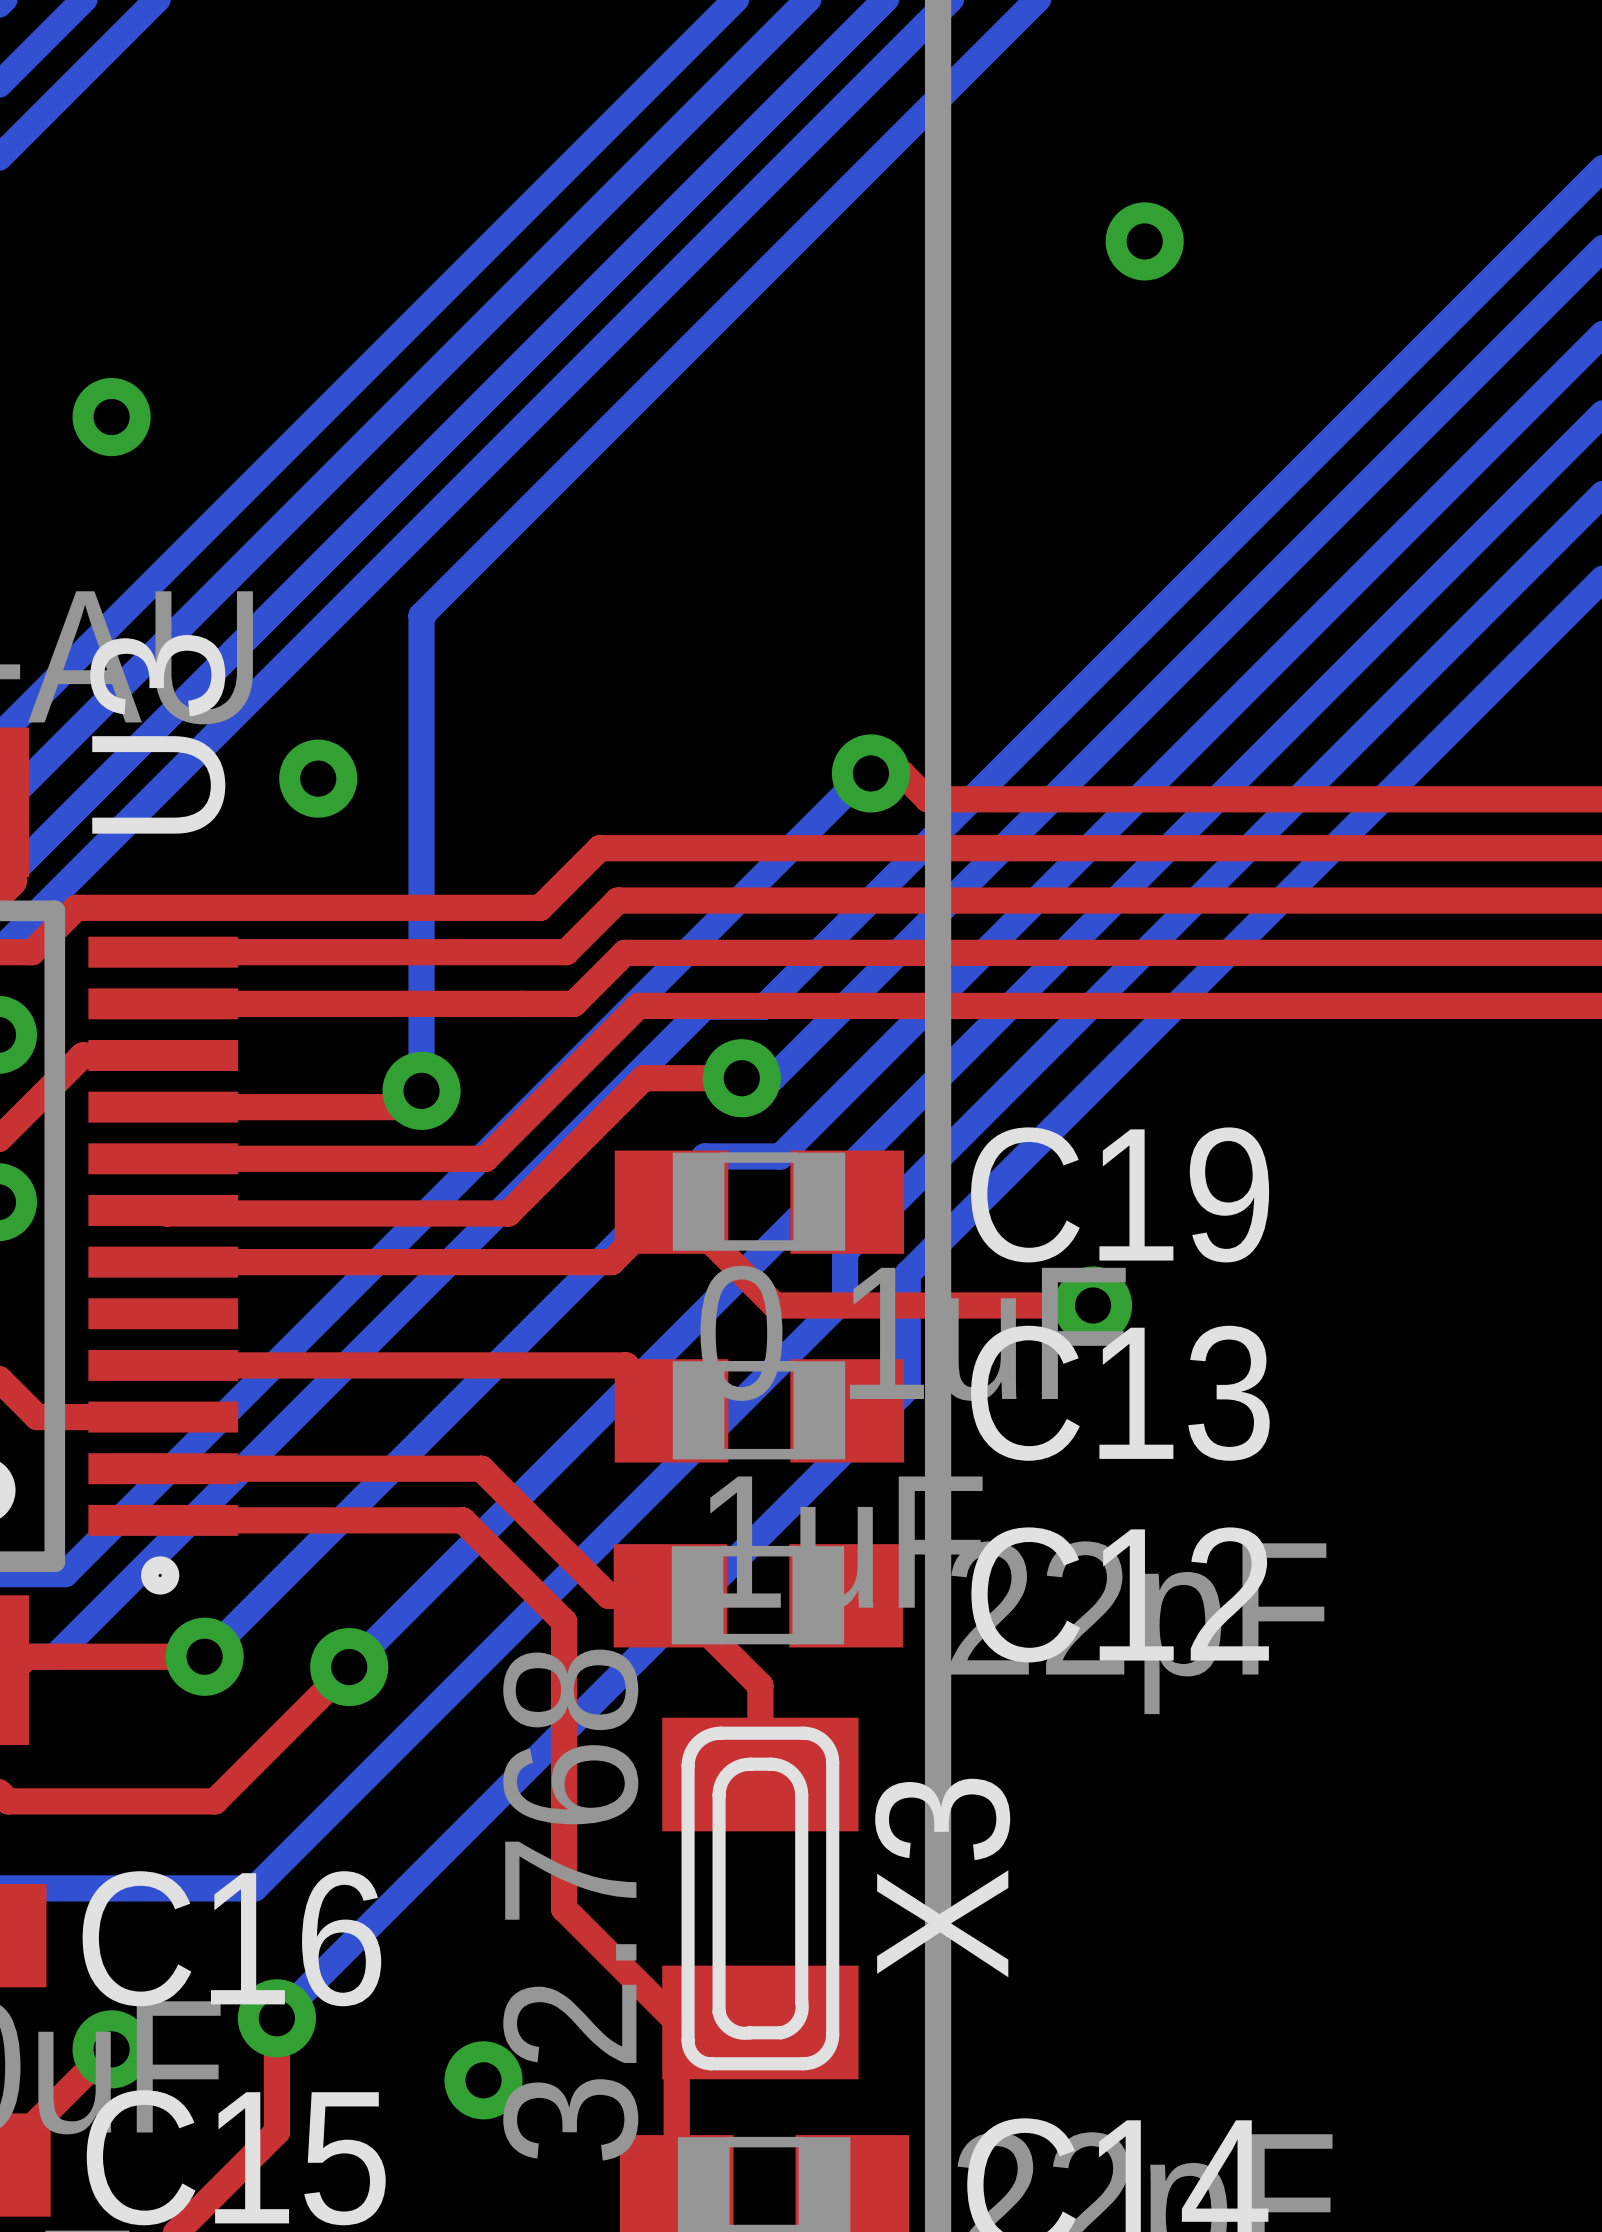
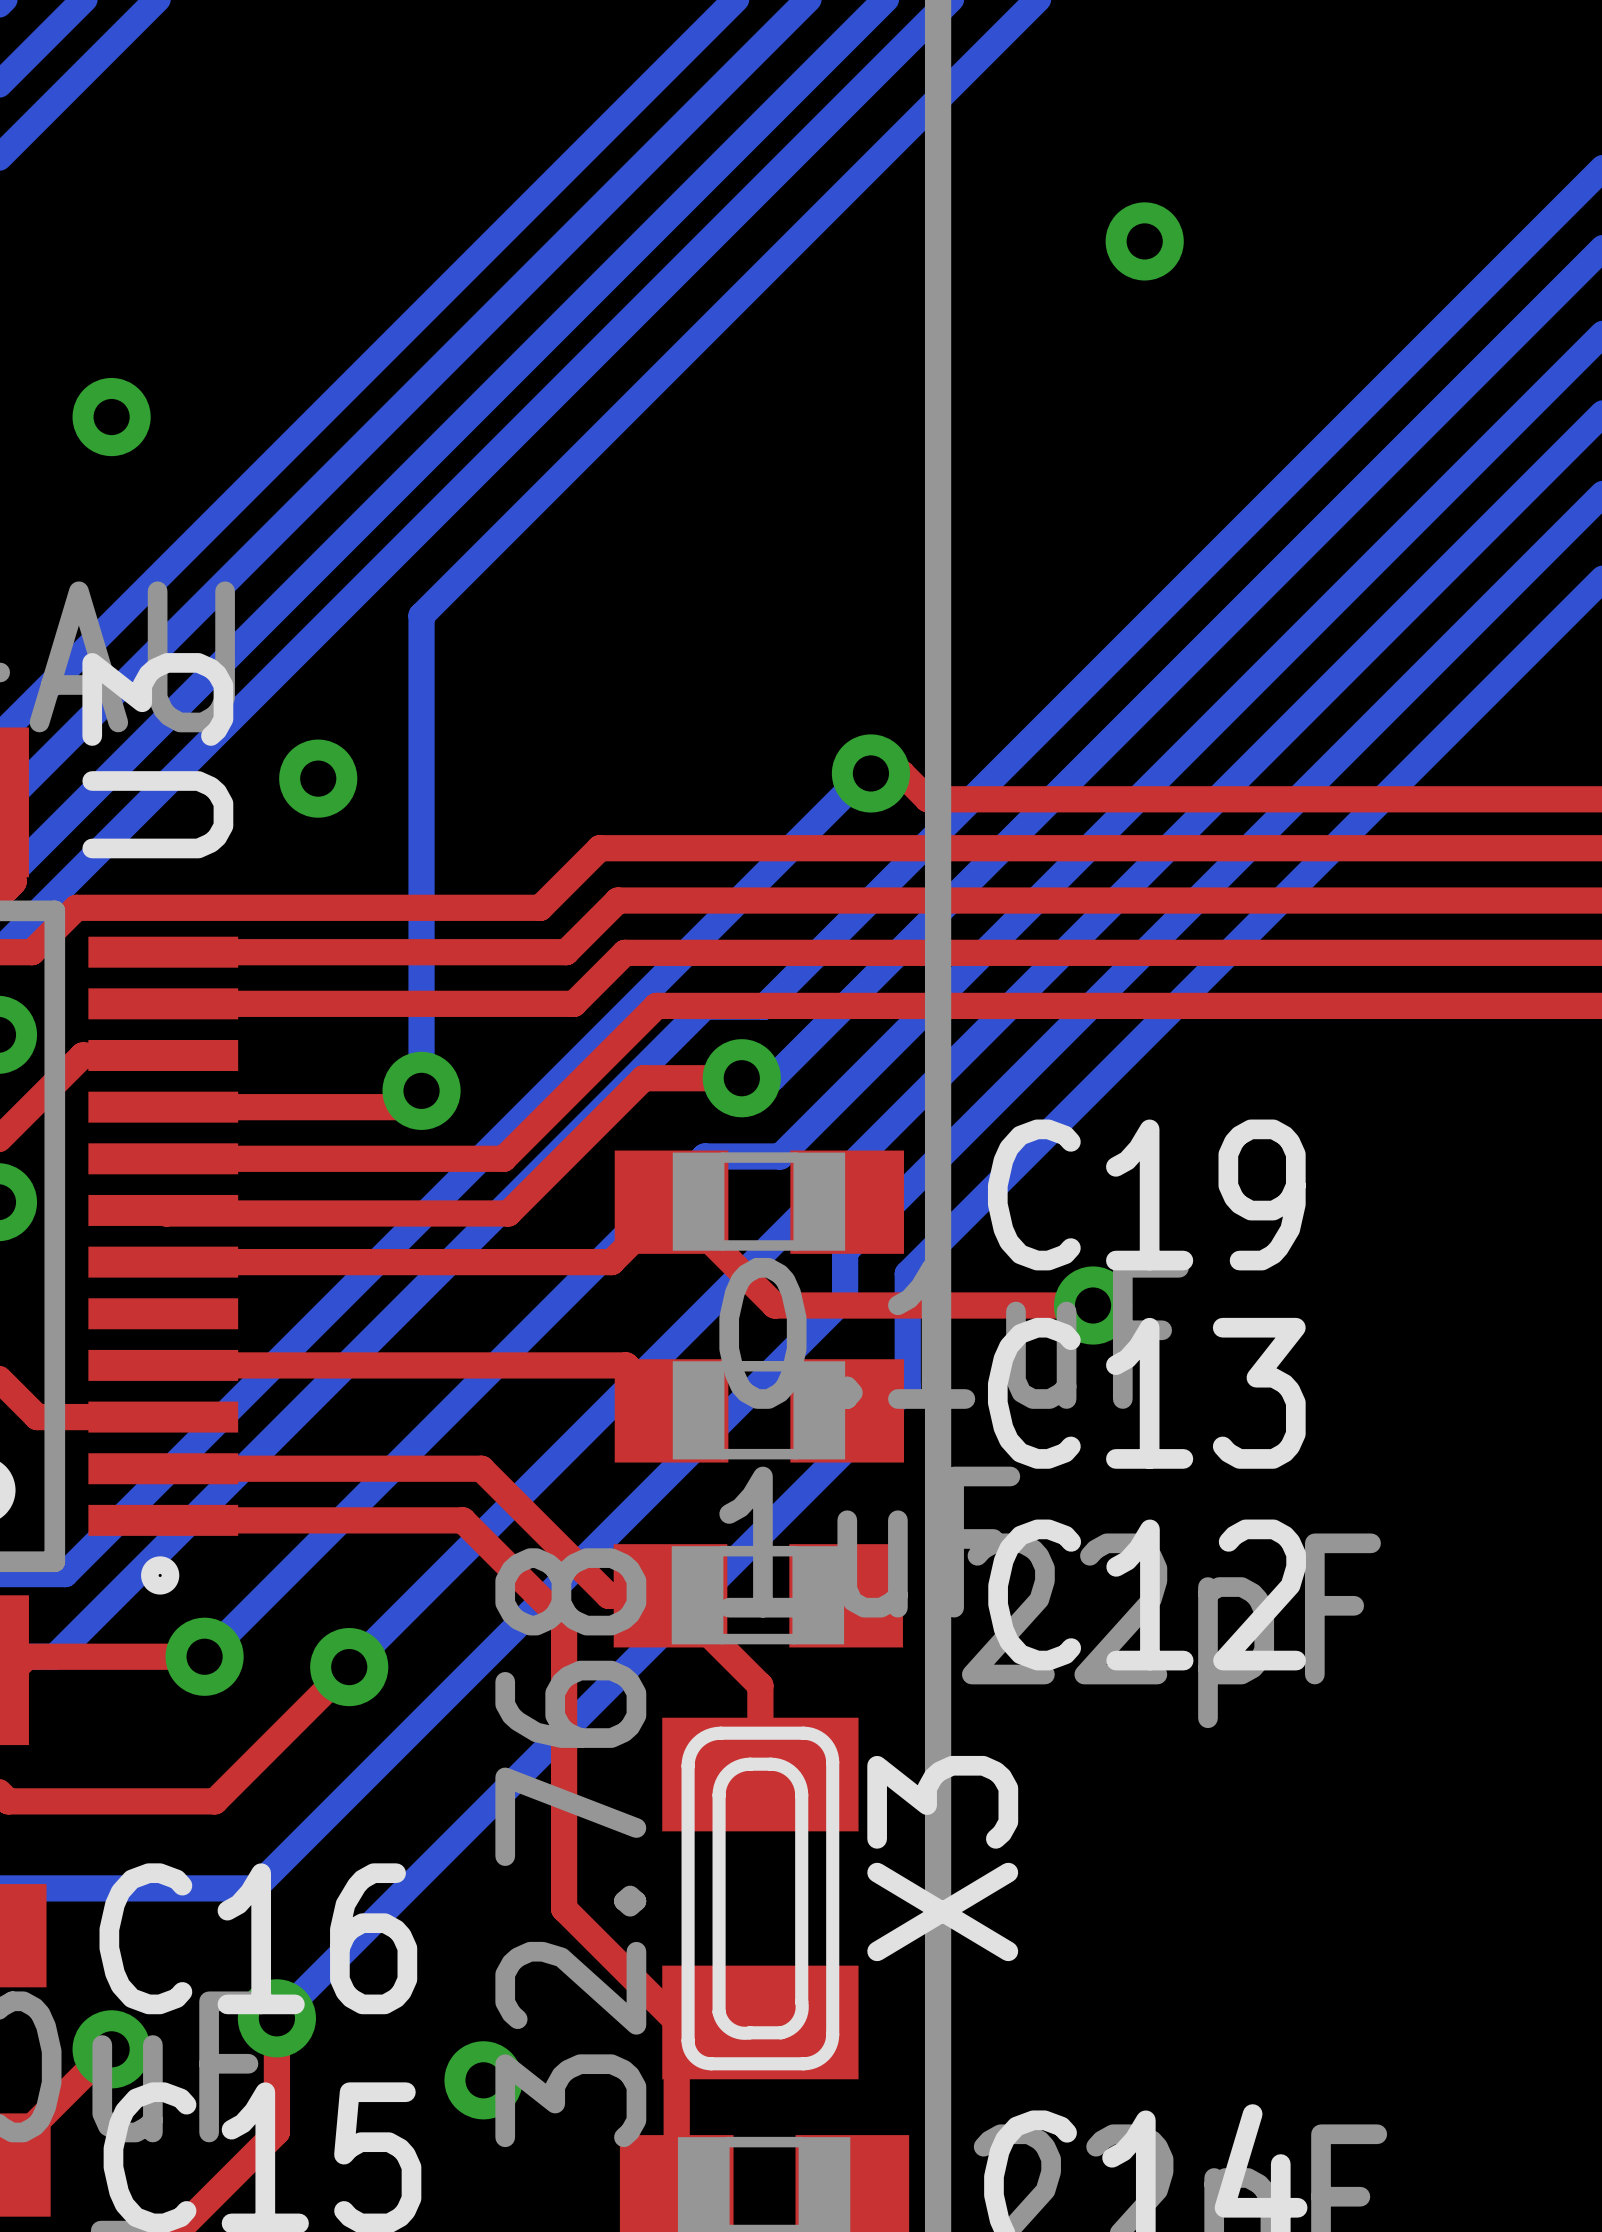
top track: (656, 1005) (638, 1005) (485, 1158) -> (656, 1005) (503, 1158) (485, 1158)

